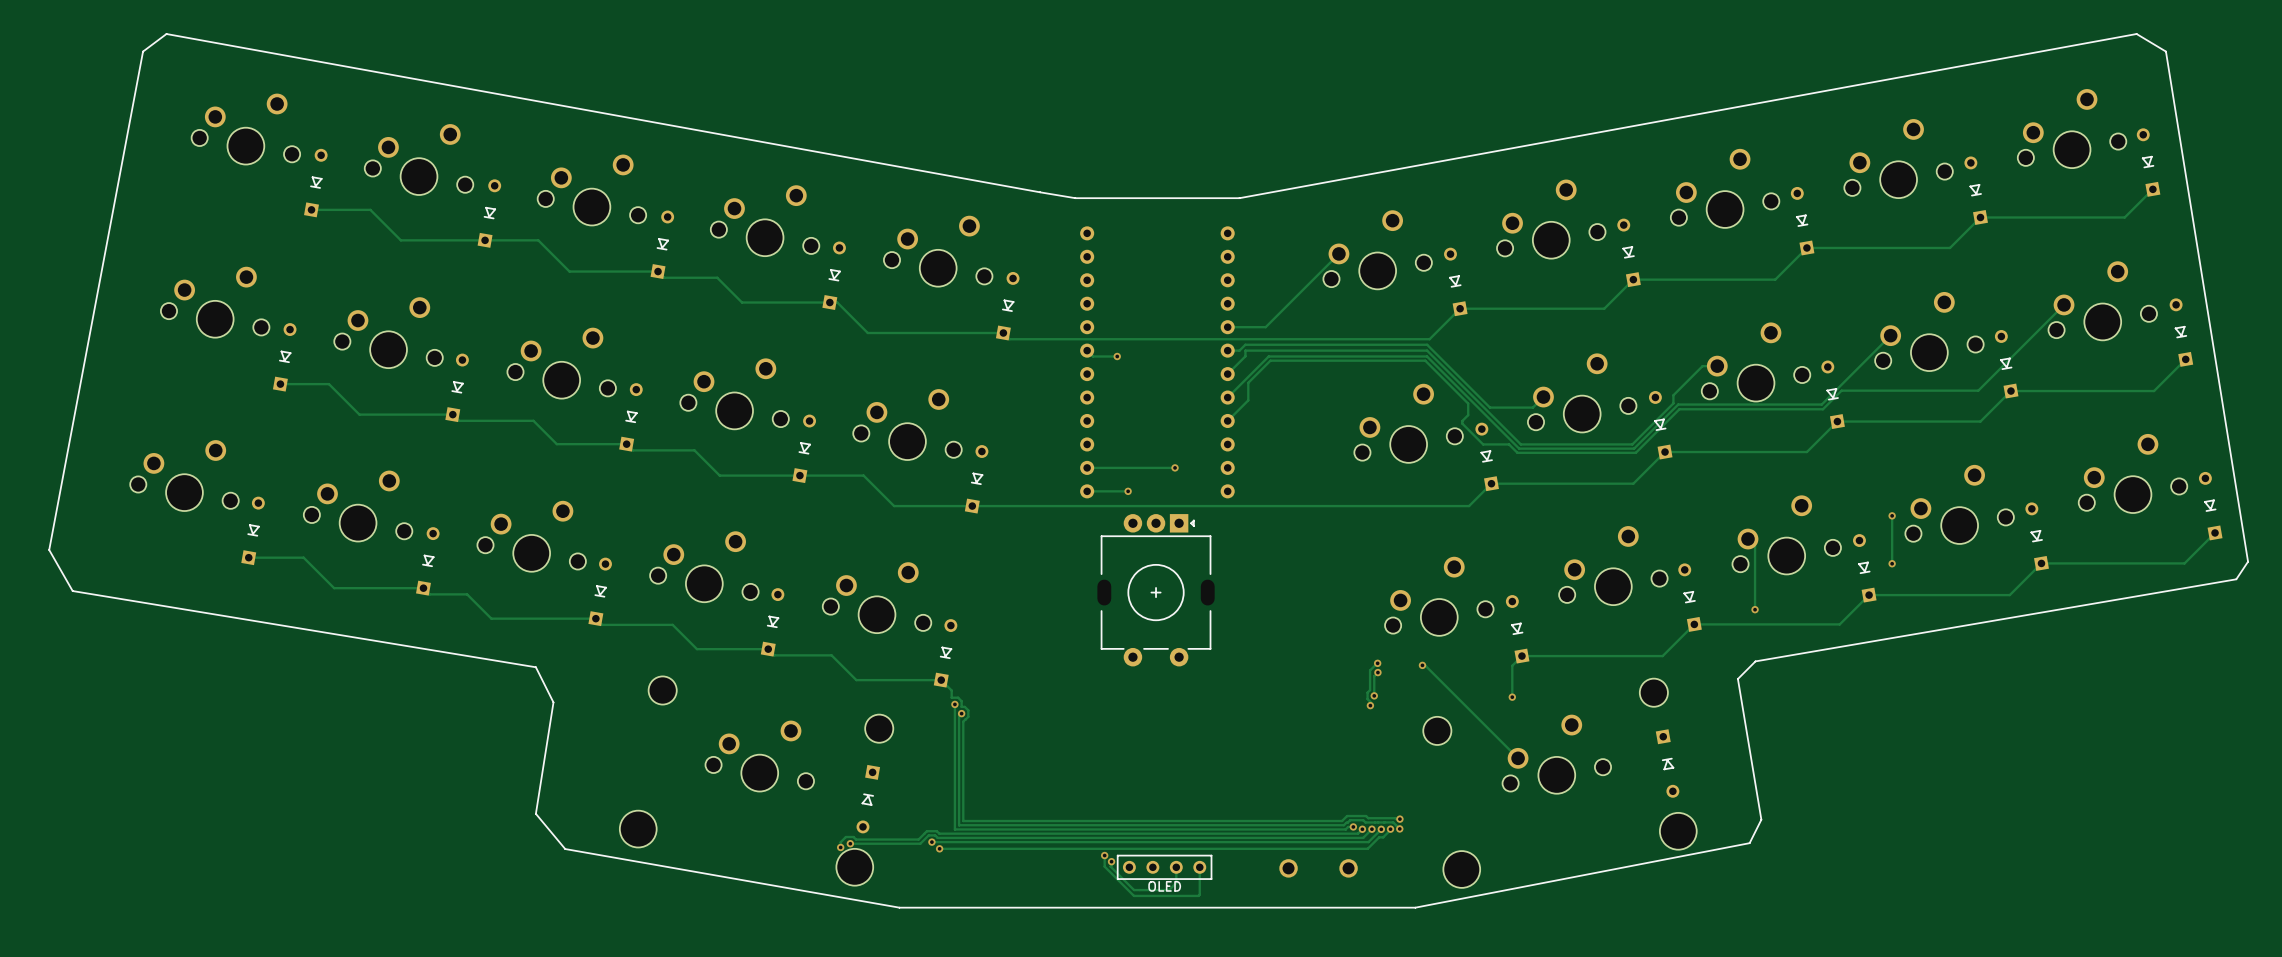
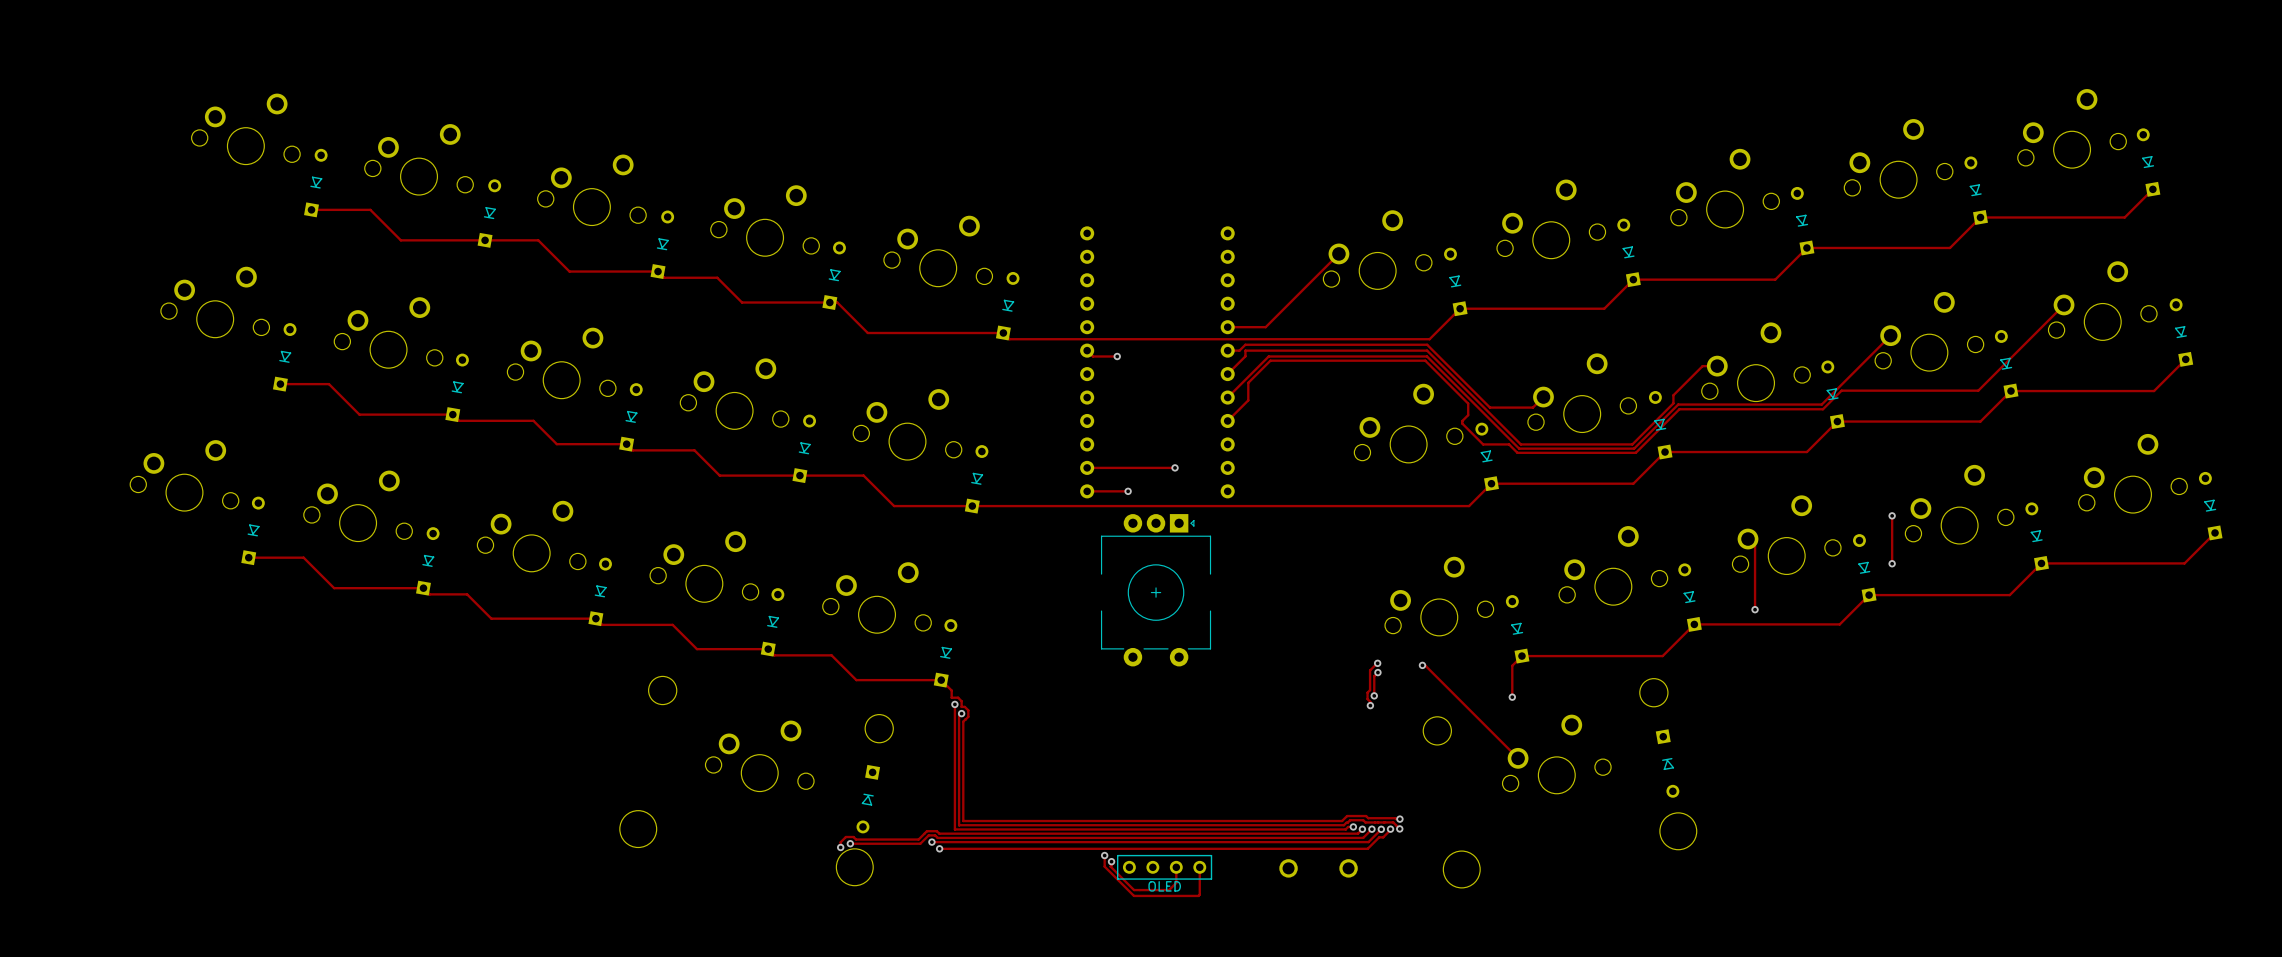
line: (166, 34) (143, 51) (49, 549) (72, 591) (535, 667) (553, 702) (535, 813) (565, 849) (899, 907) (1415, 907) (1749, 843) (1761, 819) (1737, 678) (1755, 661) (2236, 579) (2248, 561) (2165, 51) (2136, 34) (1239, 198) (1075, 198) (166, 34) -> none

